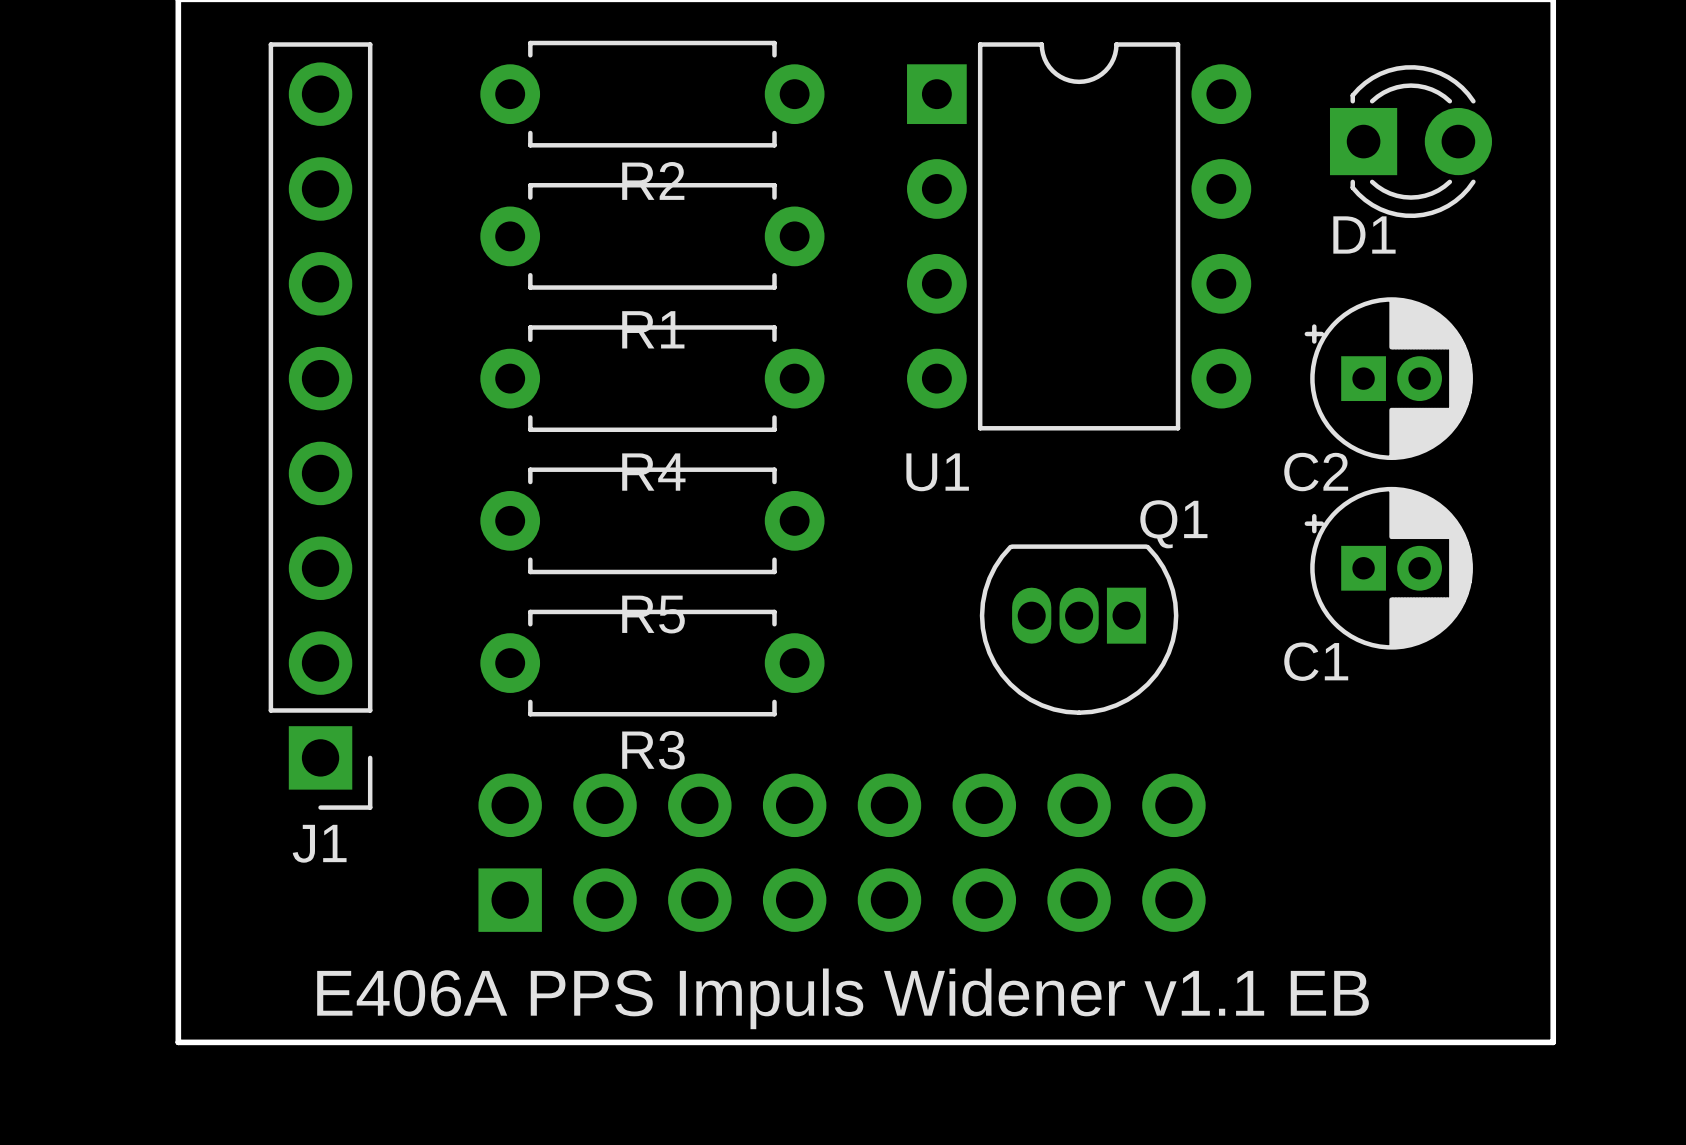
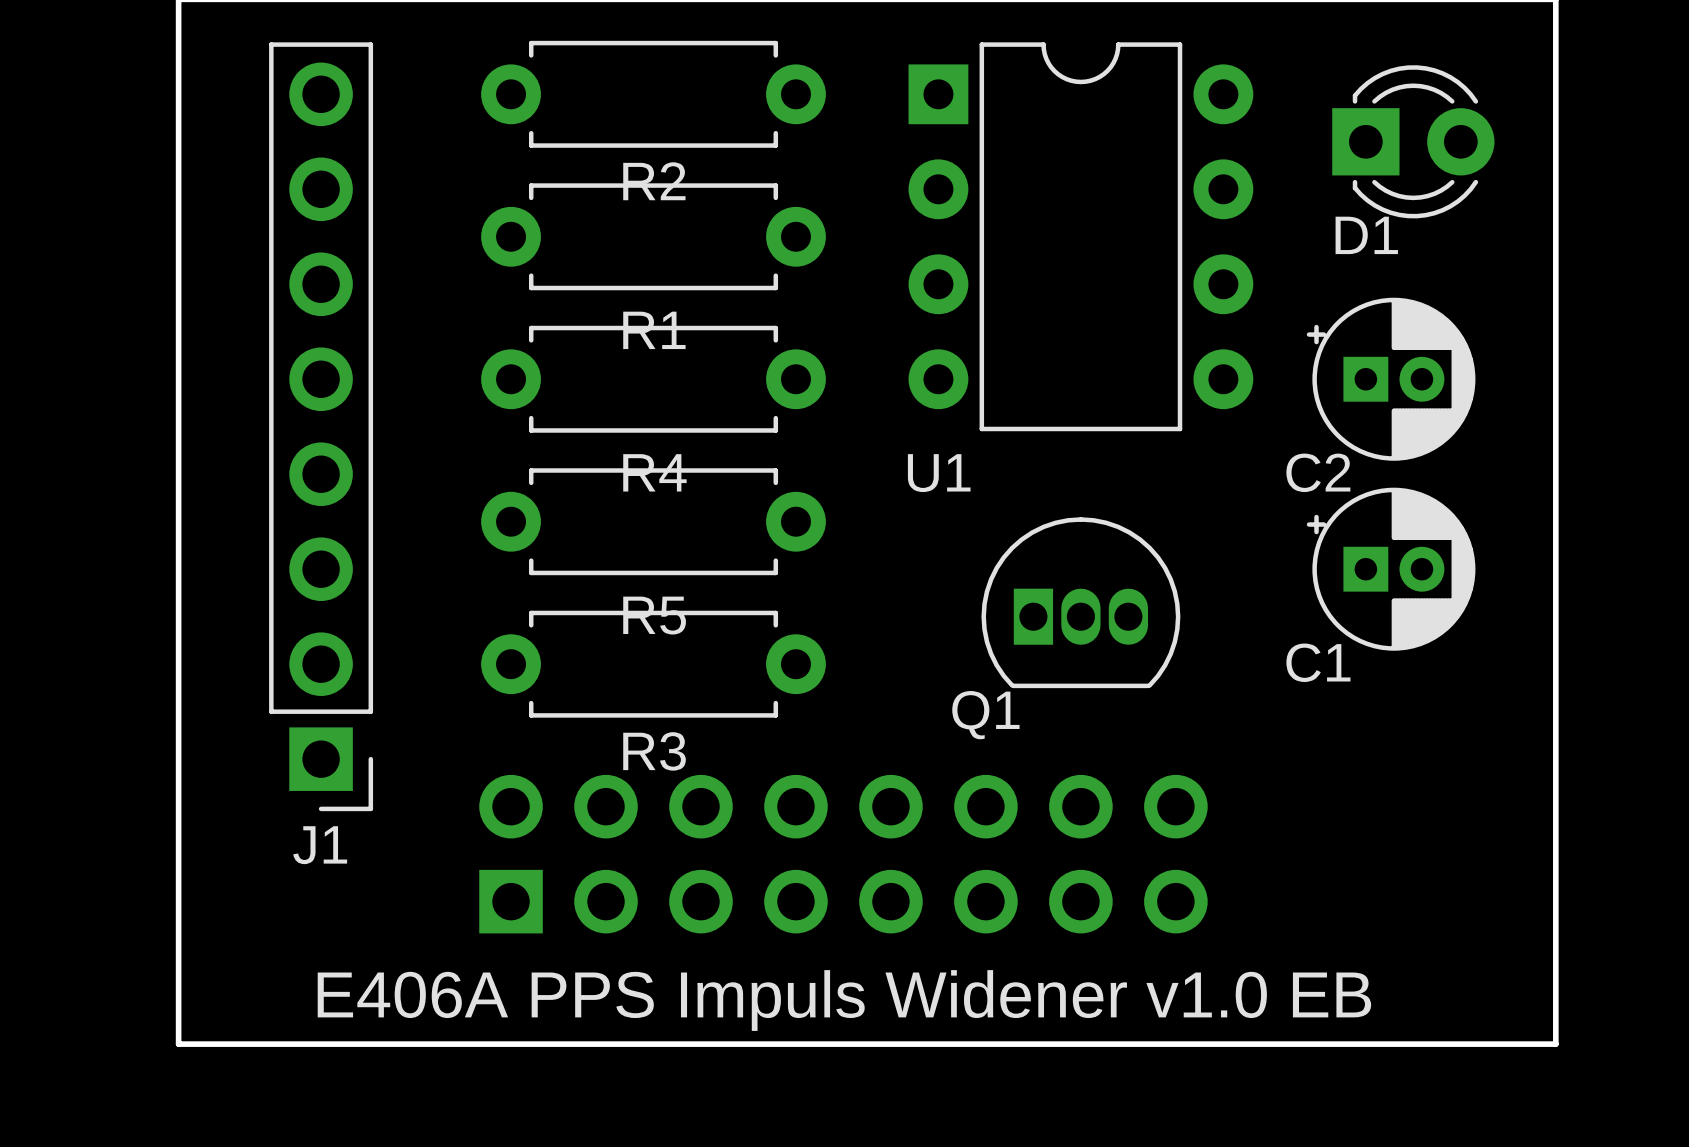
Q1 rotation: 0° (1079, 629) -> 180° (1080, 602)
text: E406A PPS Impuls Widener v1.1 EB (843, 998) -> E406A PPS Impuls Widener v1.0 EB (844, 1000)

